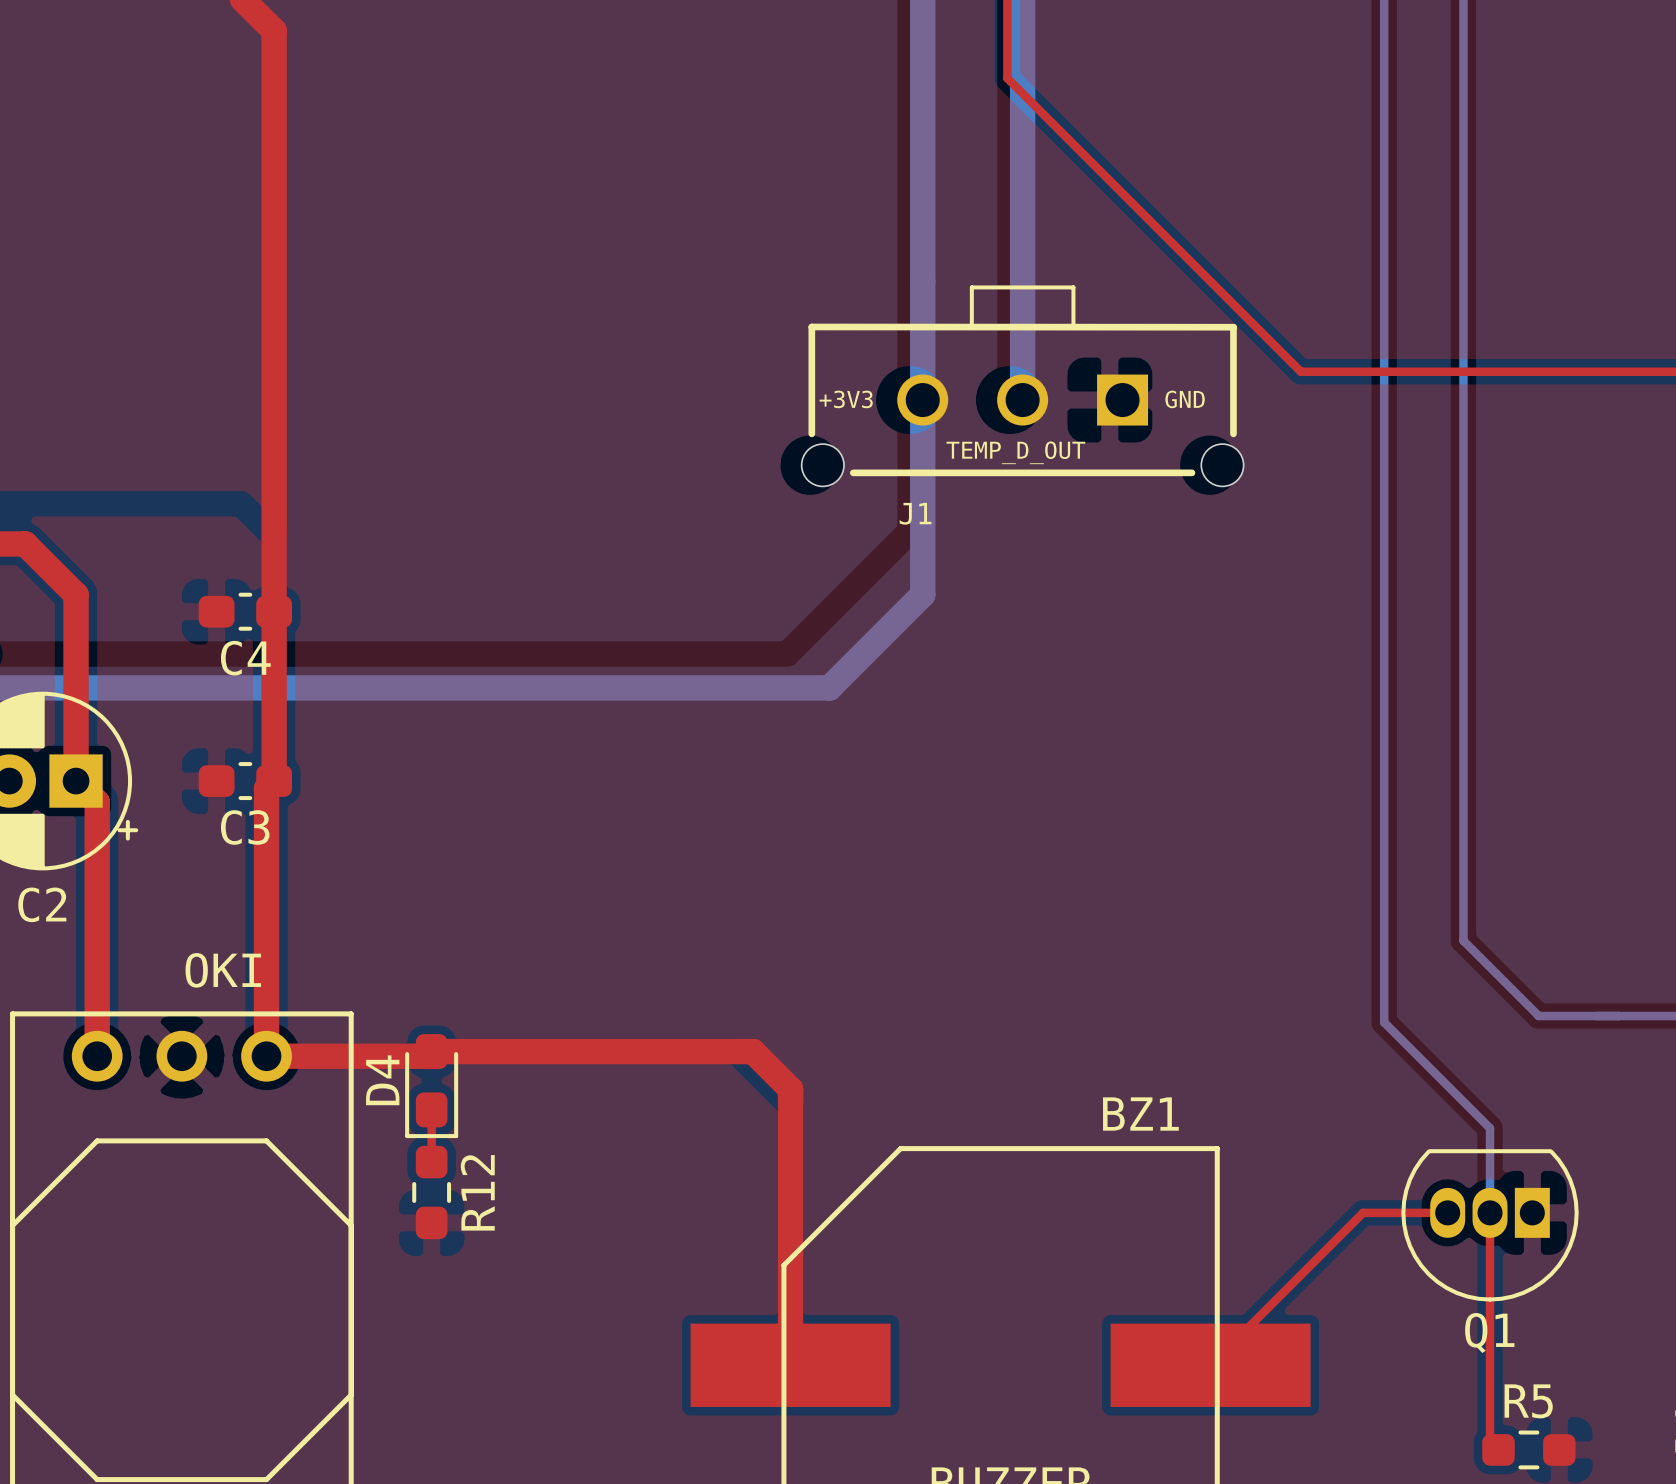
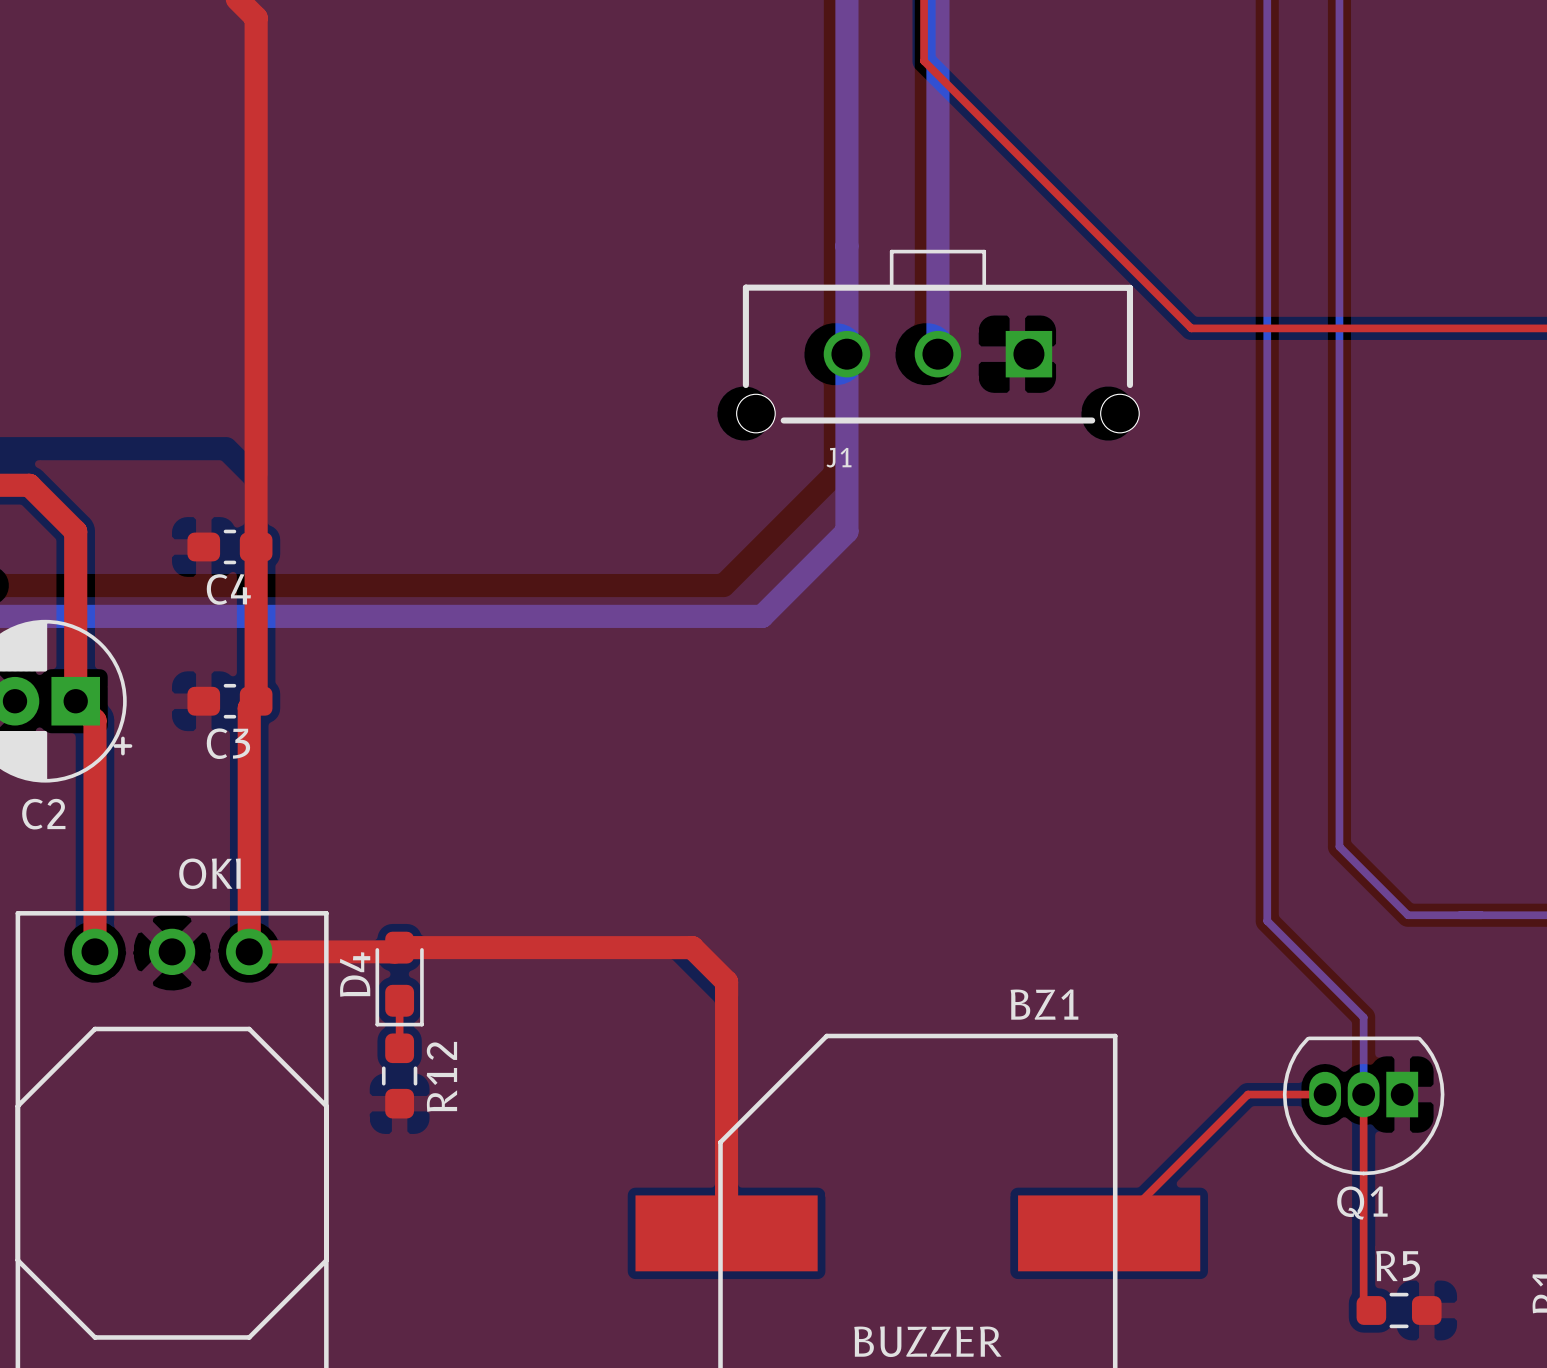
text: +3V3 (846, 399) -> none
text: GND (1185, 399) -> none
text: TEMP_D_OUT (1015, 452) -> none

